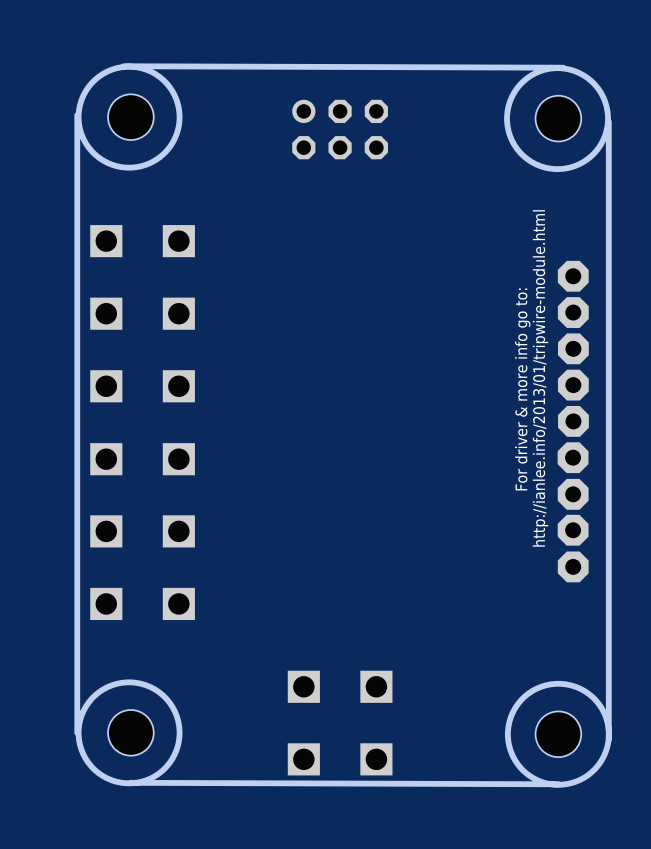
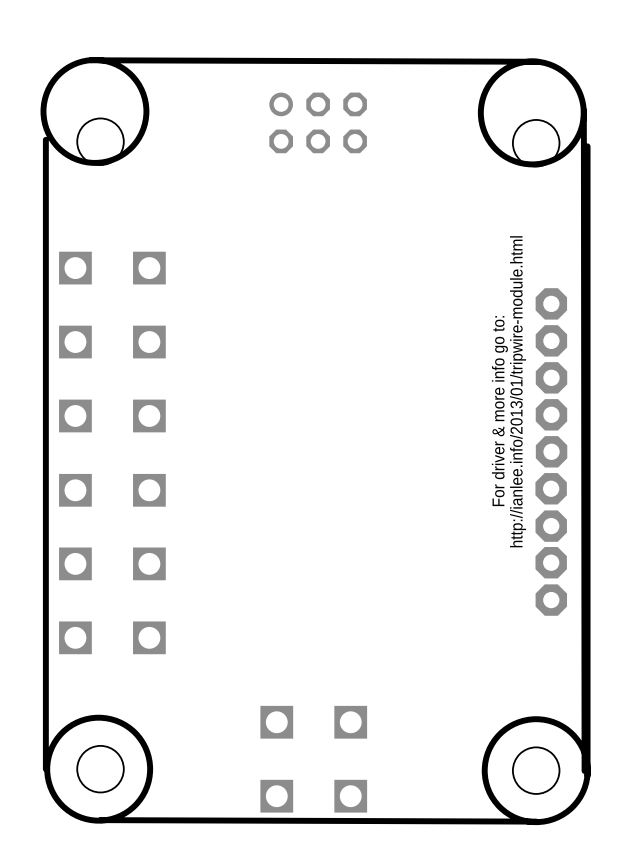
board edge: (123, 66) (563, 67) -> (90, 60) (538, 61)
board edge: none -> (583, 110) (584, 771)
round board edge position: (129, 117) -> (94, 111)
round board edge position: (557, 118) -> (532, 112)
part position: (340, 129) -> (318, 122)

